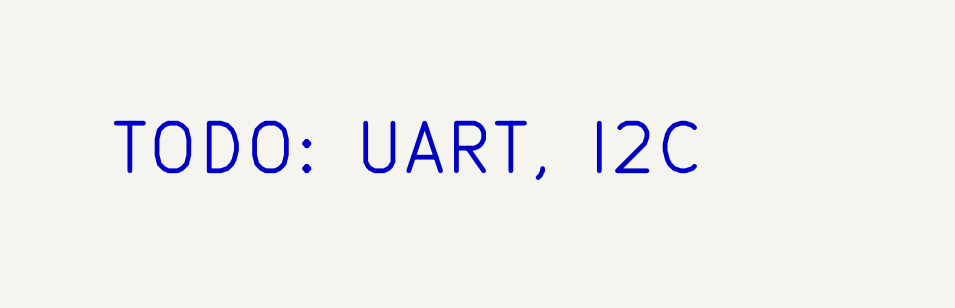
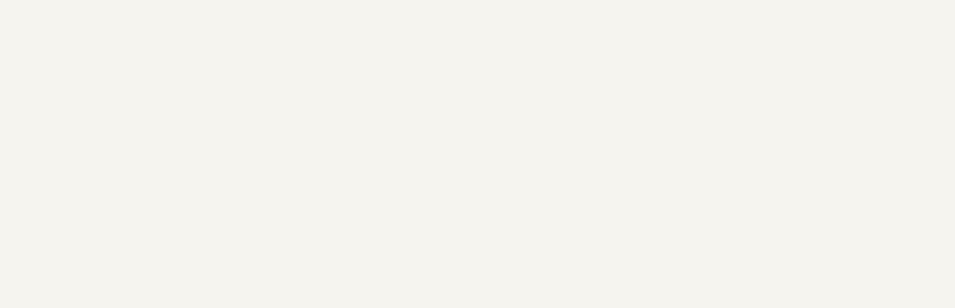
text: TODO: UART, I2C (405, 150) -> none

